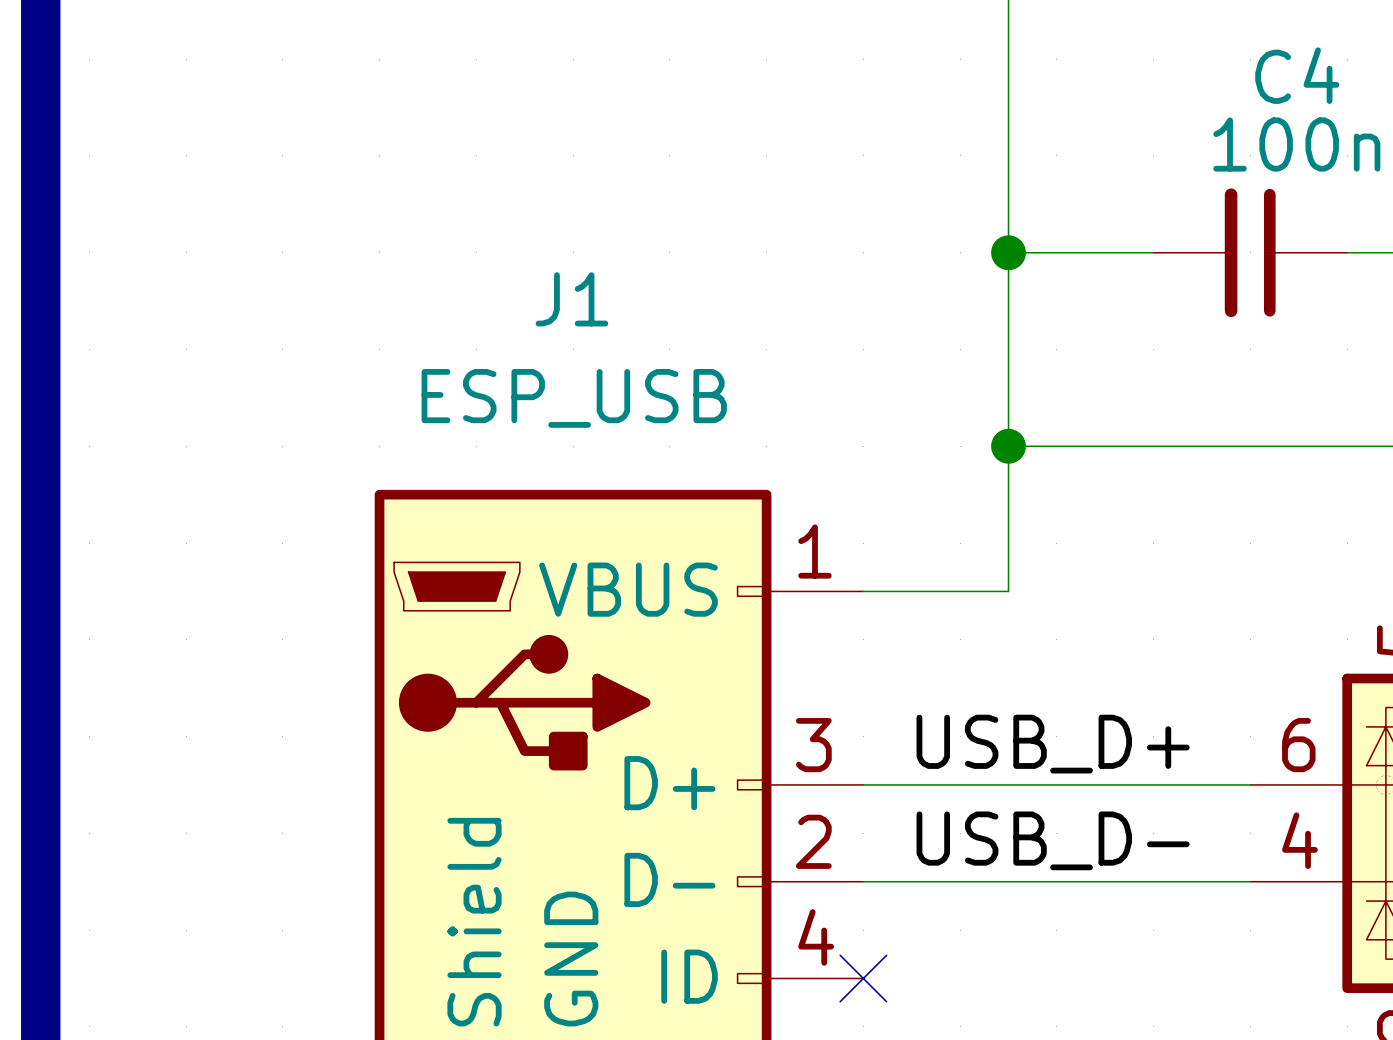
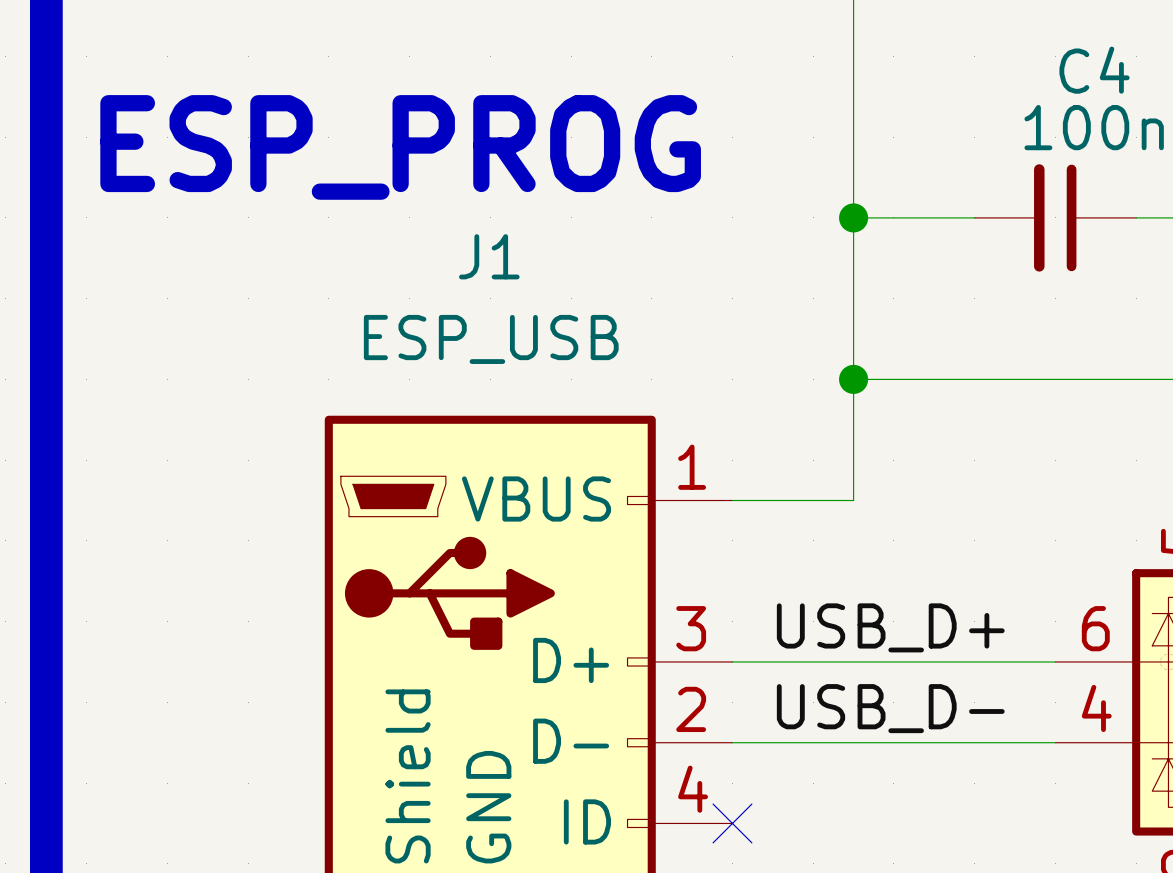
text: none -> ESP_PROG (400, 147)

